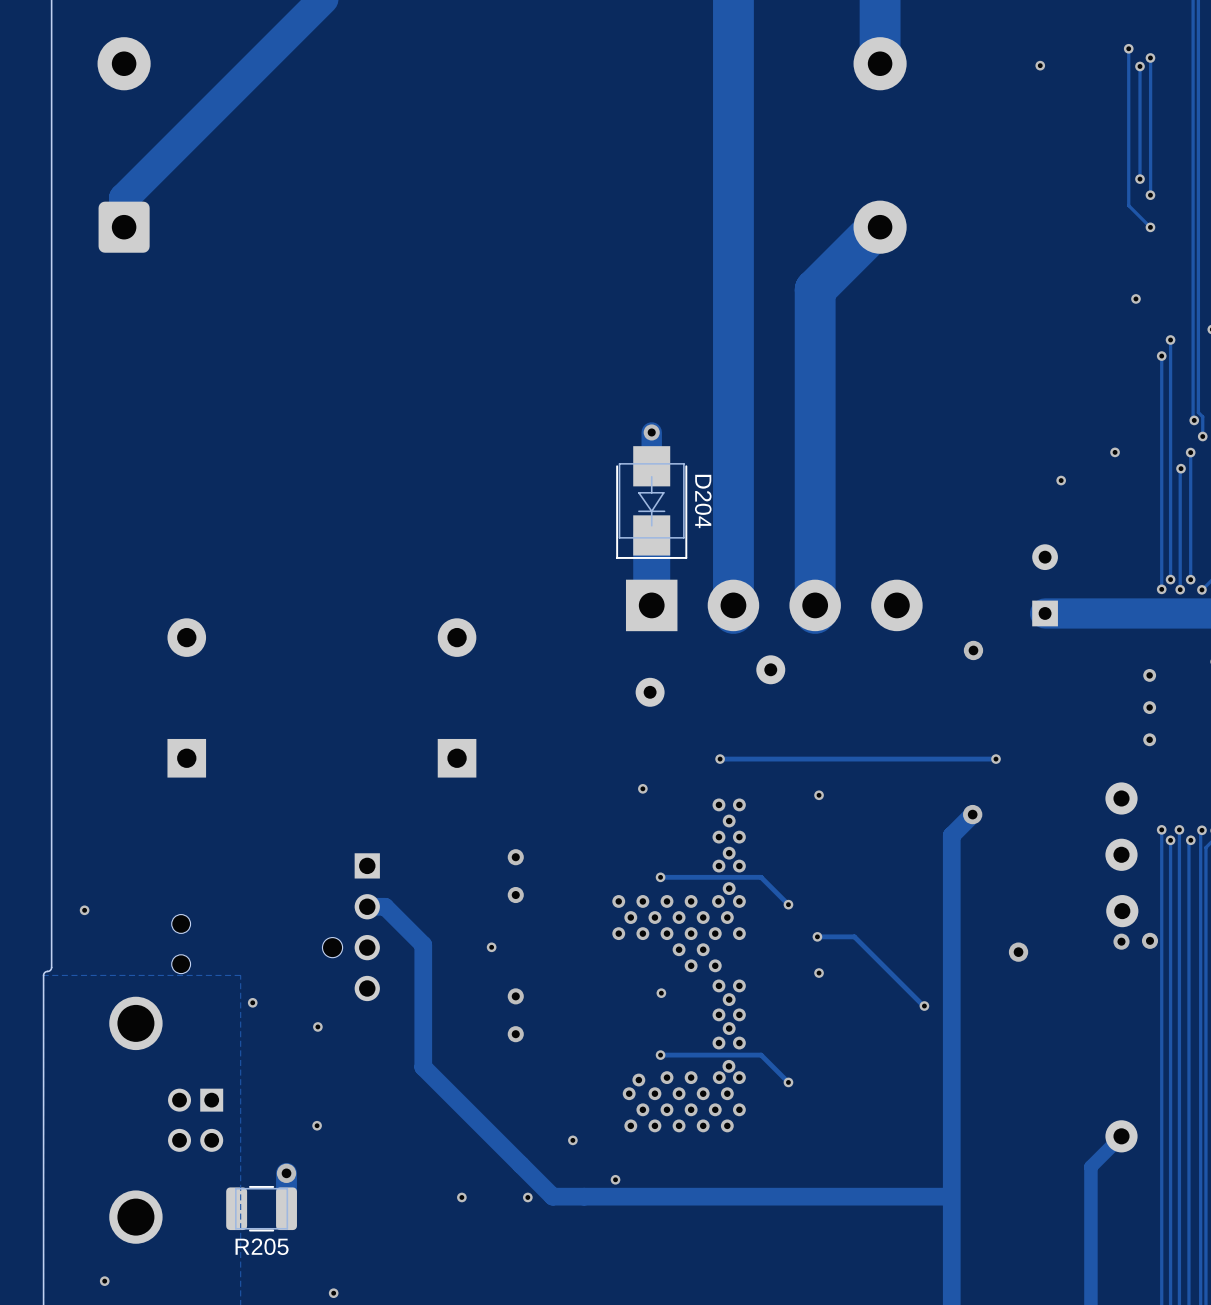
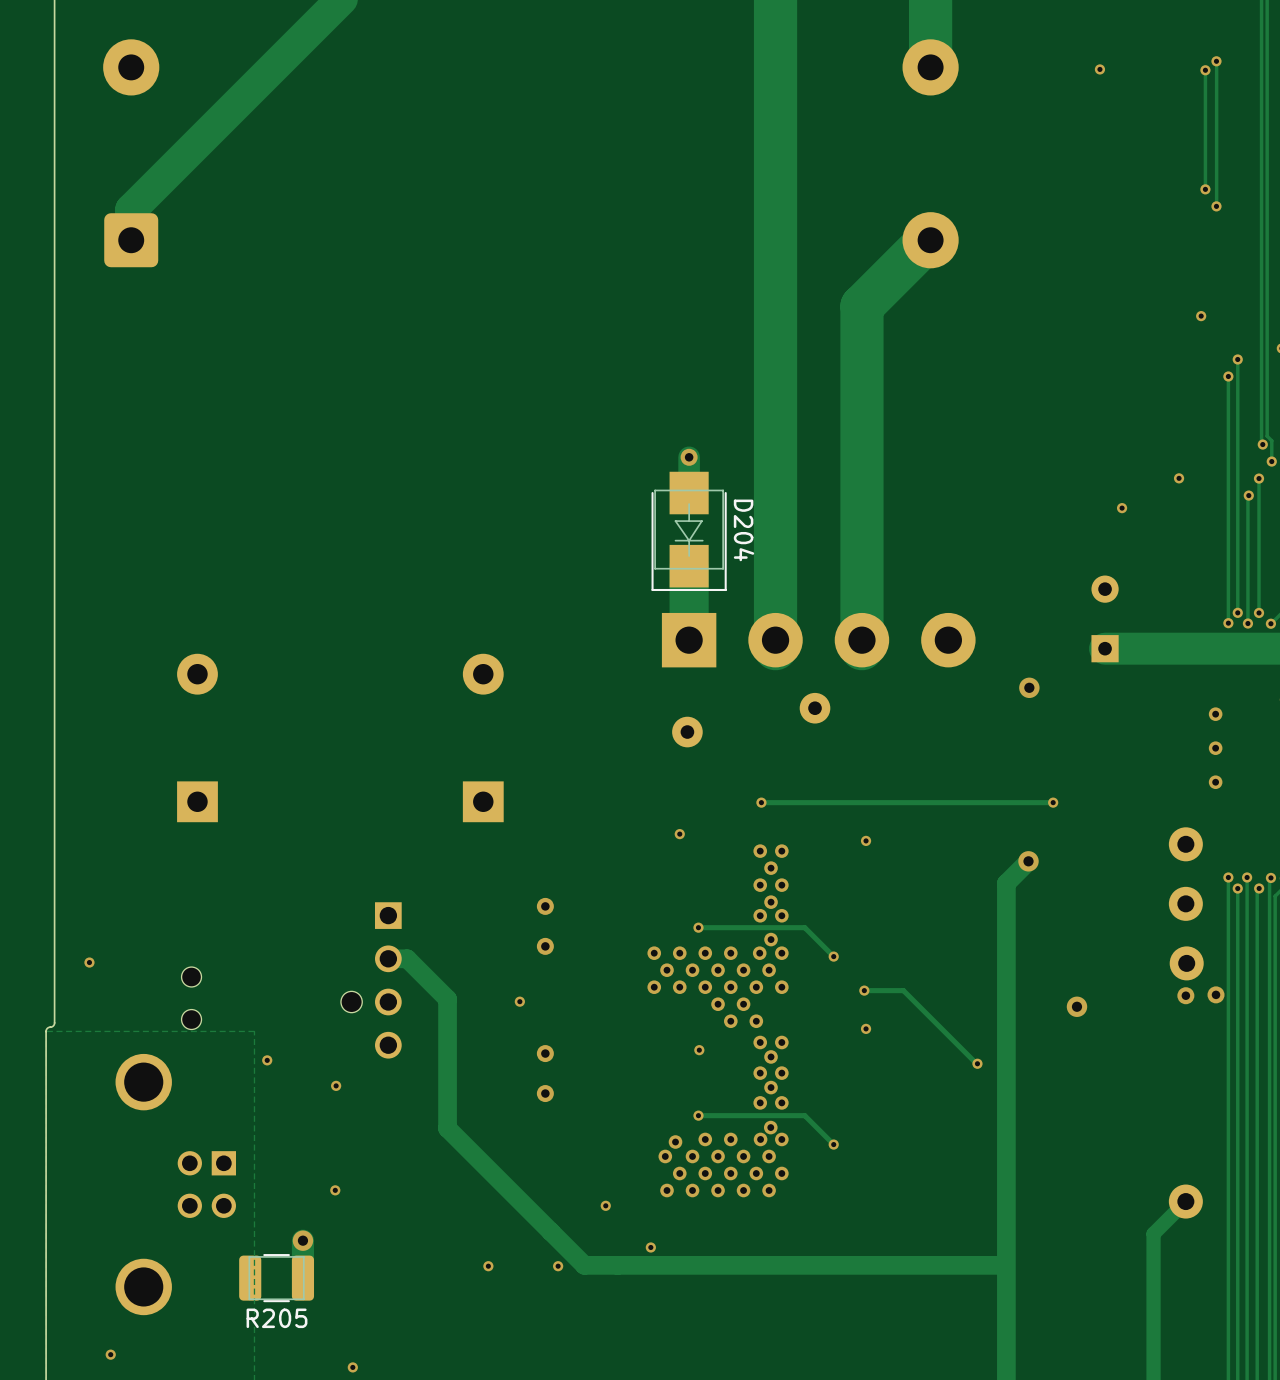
track: (1128, 48) (1128, 205) (1150, 227) -> none
via: (1128, 48) -> none
via: (1150, 227) -> none

